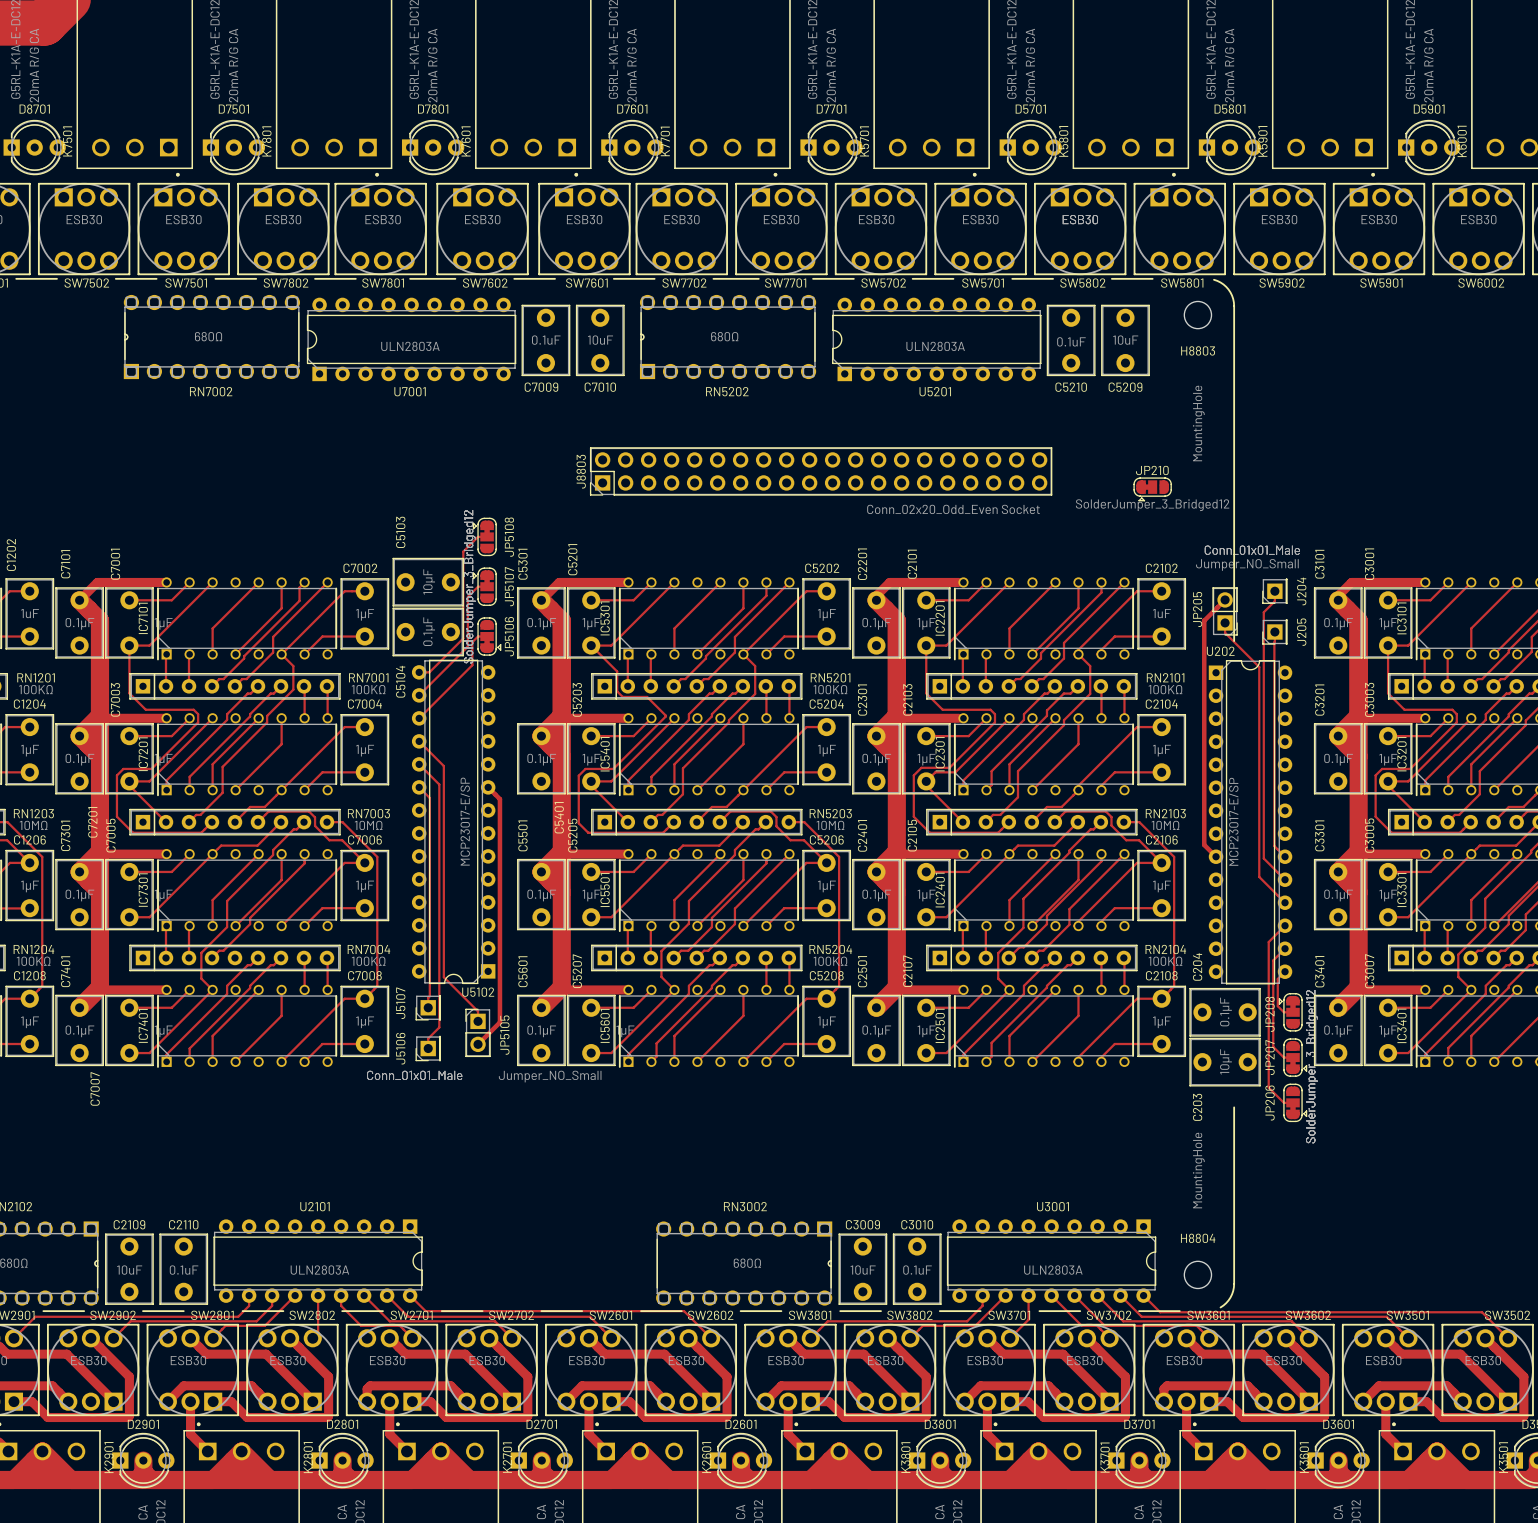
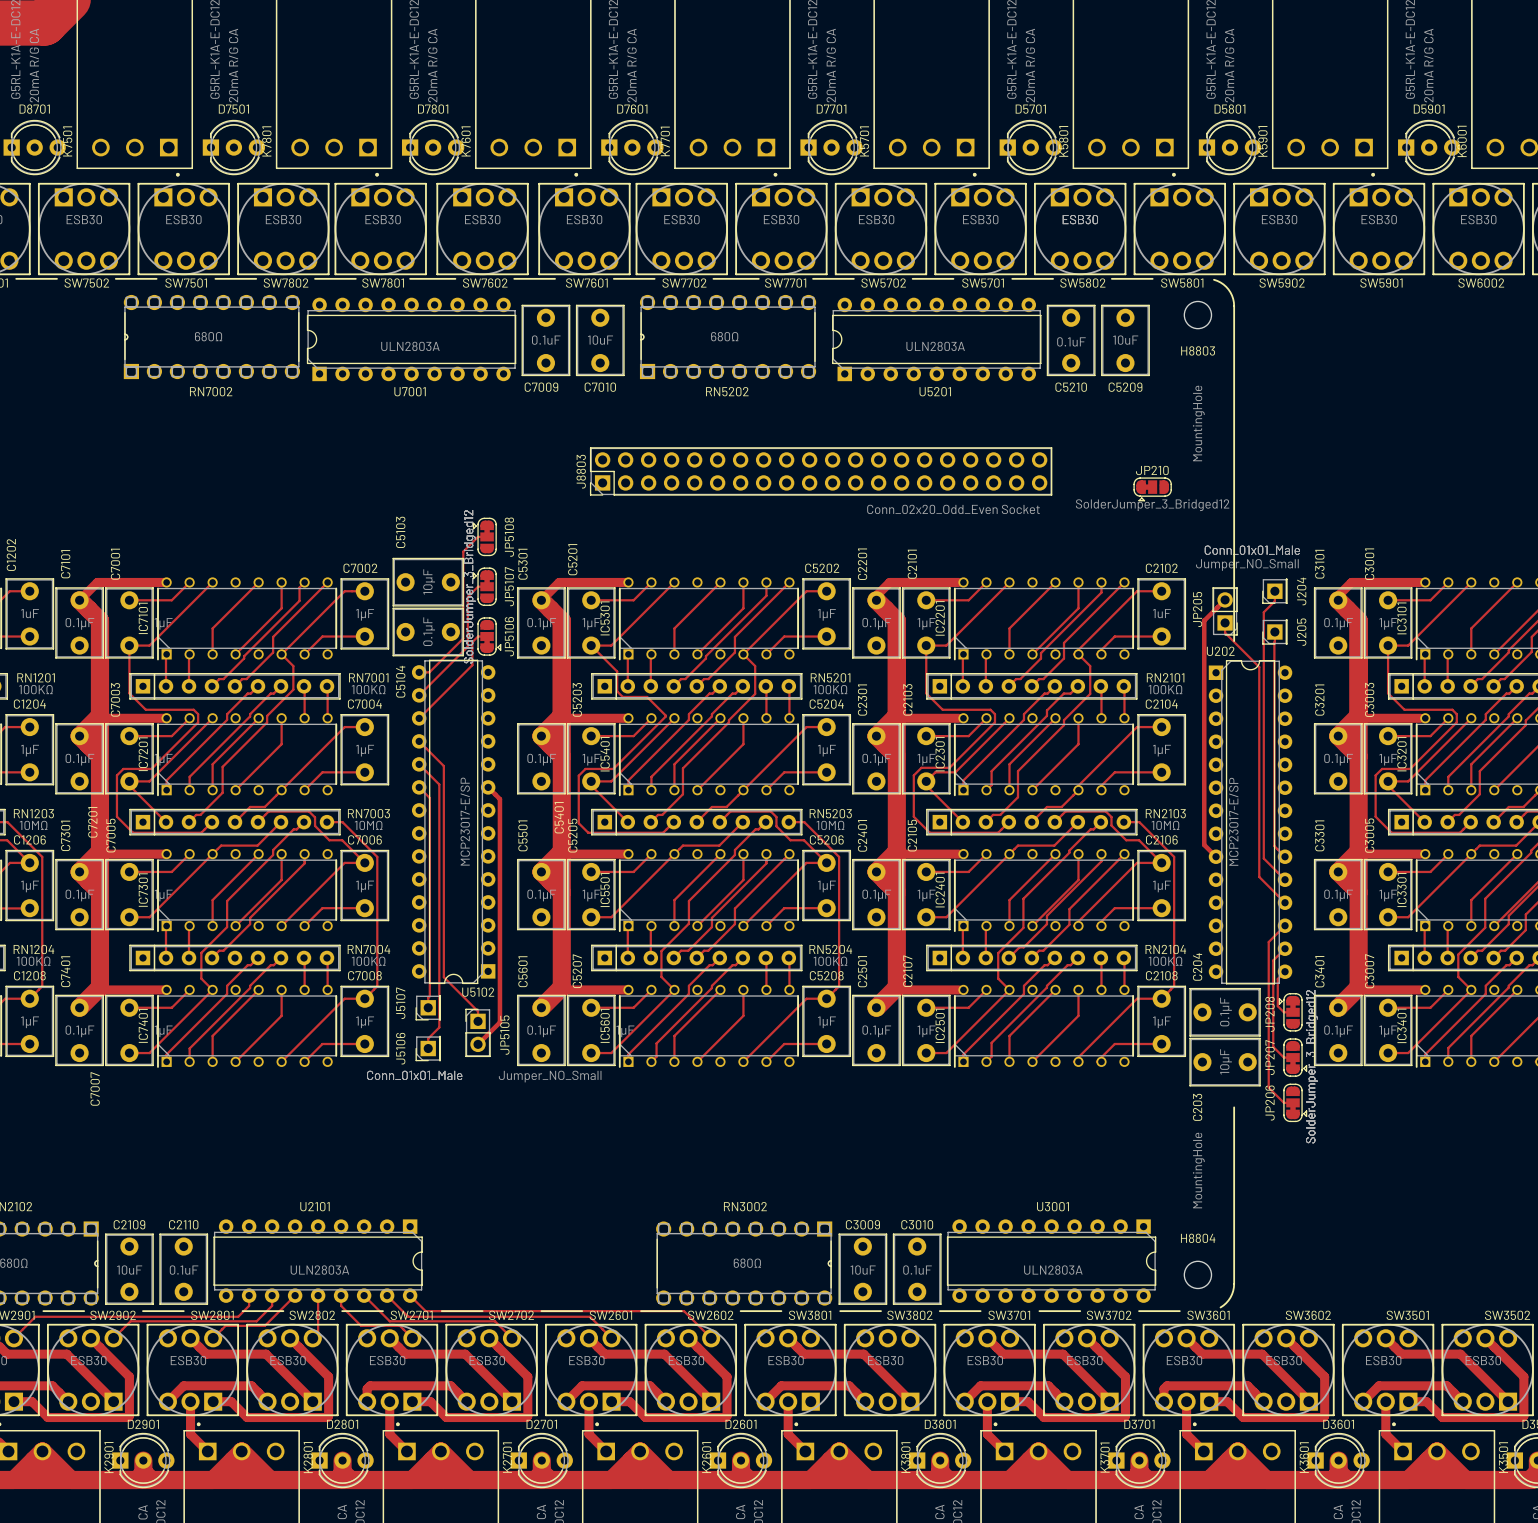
track: (982, 1295) (982, 1305) (967, 1321) (827, 1321) (810, 1338) -> none
track: (1005, 1295) (975, 1325) (922, 1325) (910, 1338) -> none
track: (1028, 1295) (1028, 1319) (1010, 1338) -> none
track: (1051, 1295) (1081, 1325) (1097, 1325) (1109, 1338) -> none
track: (1074, 1295) (1104, 1325) (1196, 1325) (1209, 1338) -> none
track: (1097, 1295) (1123, 1321) (1291, 1321) (1308, 1338) -> none
track: (1120, 1295) (1141, 1316) (1386, 1316) (1408, 1338) -> none
track: (1143, 1295) (1160, 1312) (1482, 1312) (1508, 1338) -> none
track: (887, 1338) (926, 1376) (924, 1417) (844, 1417) (828, 1401) (810, 1401) -> none

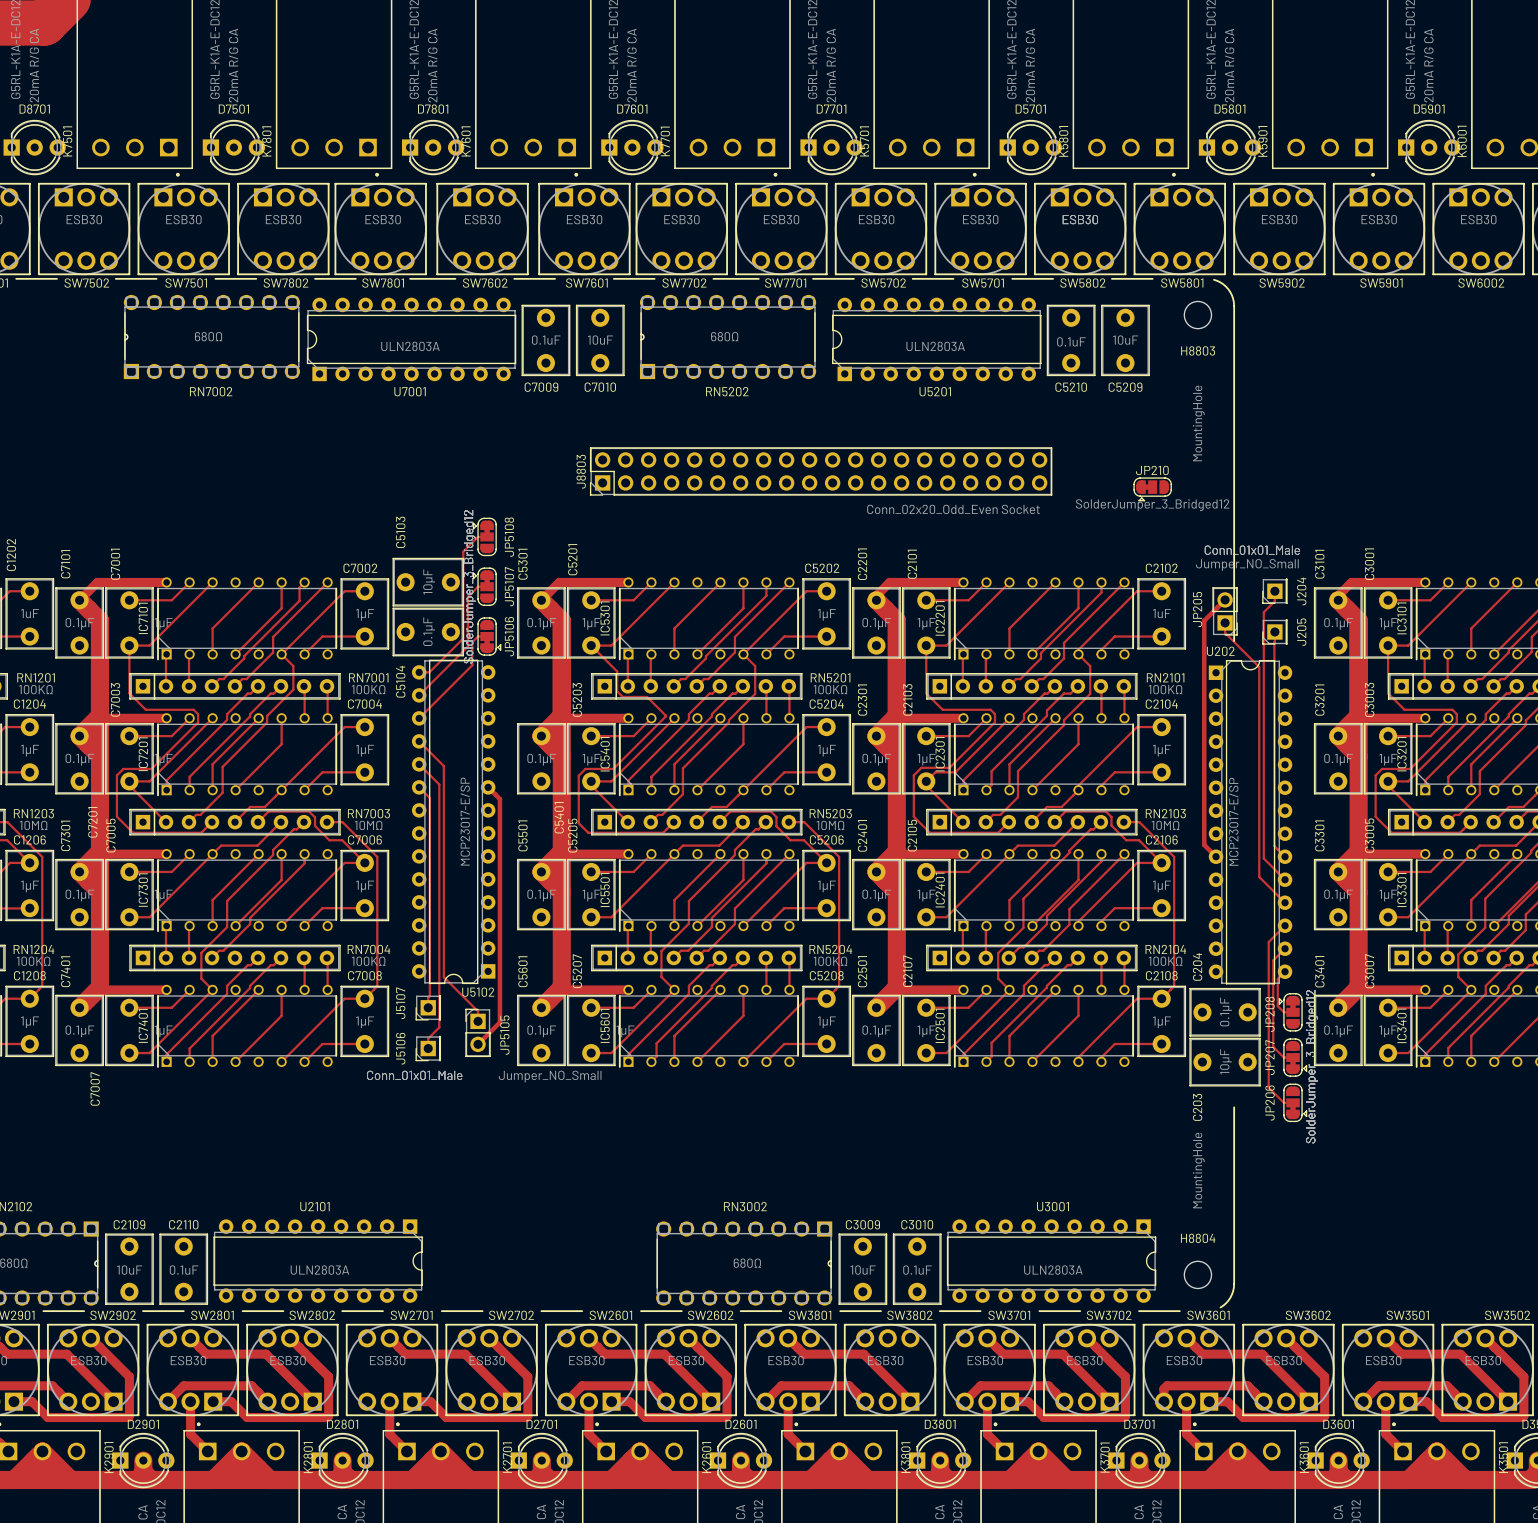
track: (249, 1295) (249, 1305) (238, 1316) (35, 1316) (13, 1338) -> none
track: (272, 1295) (272, 1305) (256, 1321) (130, 1321) (113, 1338) -> none
track: (295, 1295) (264, 1325) (225, 1325) (213, 1338) -> none
track: (318, 1295) (318, 1332) (312, 1338) -> none
track: (341, 1295) (341, 1305) (361, 1325) (399, 1325) (412, 1338) -> none
track: (364, 1295) (389, 1321) (495, 1321) (511, 1338) -> none
track: (387, 1295) (408, 1316) (590, 1316) (611, 1338) -> none
track: (410, 1295) (425, 1311) (684, 1311) (711, 1338) -> none
track: (367, 1401) (367, 1388) (370, 1385) (450, 1385) (466, 1401) -> none

